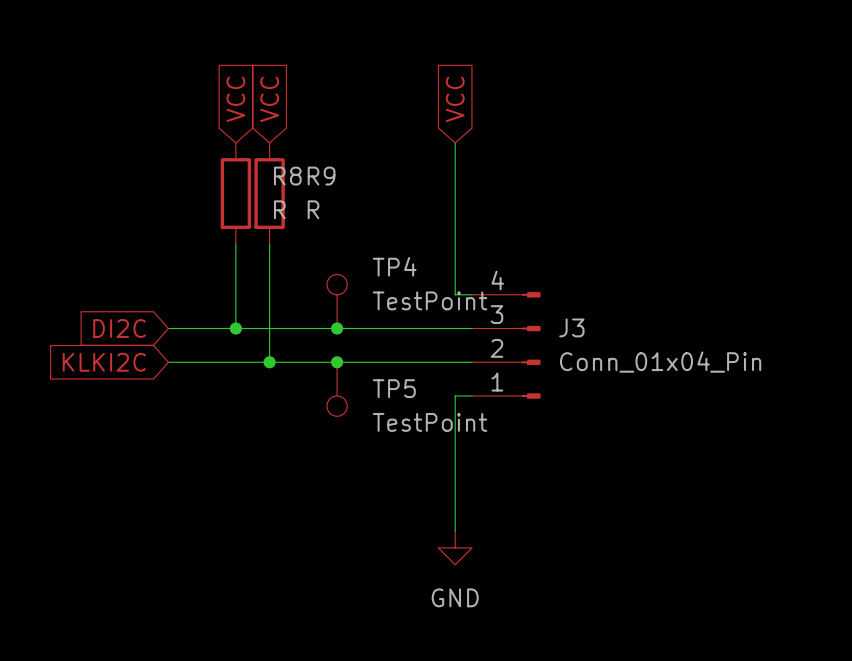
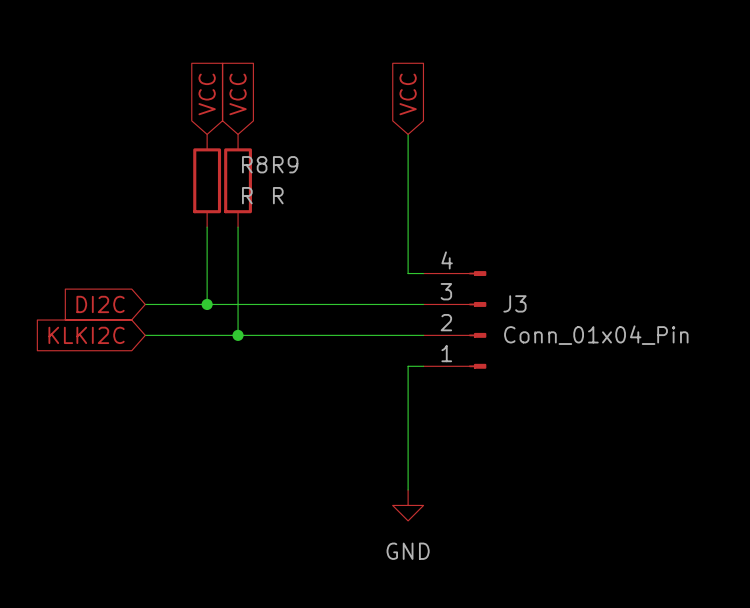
TP4: TestPoint (337, 301) -> none
junction: (337, 328) -> none
junction: (337, 362) -> none
TP5: TestPoint (337, 389) -> none

